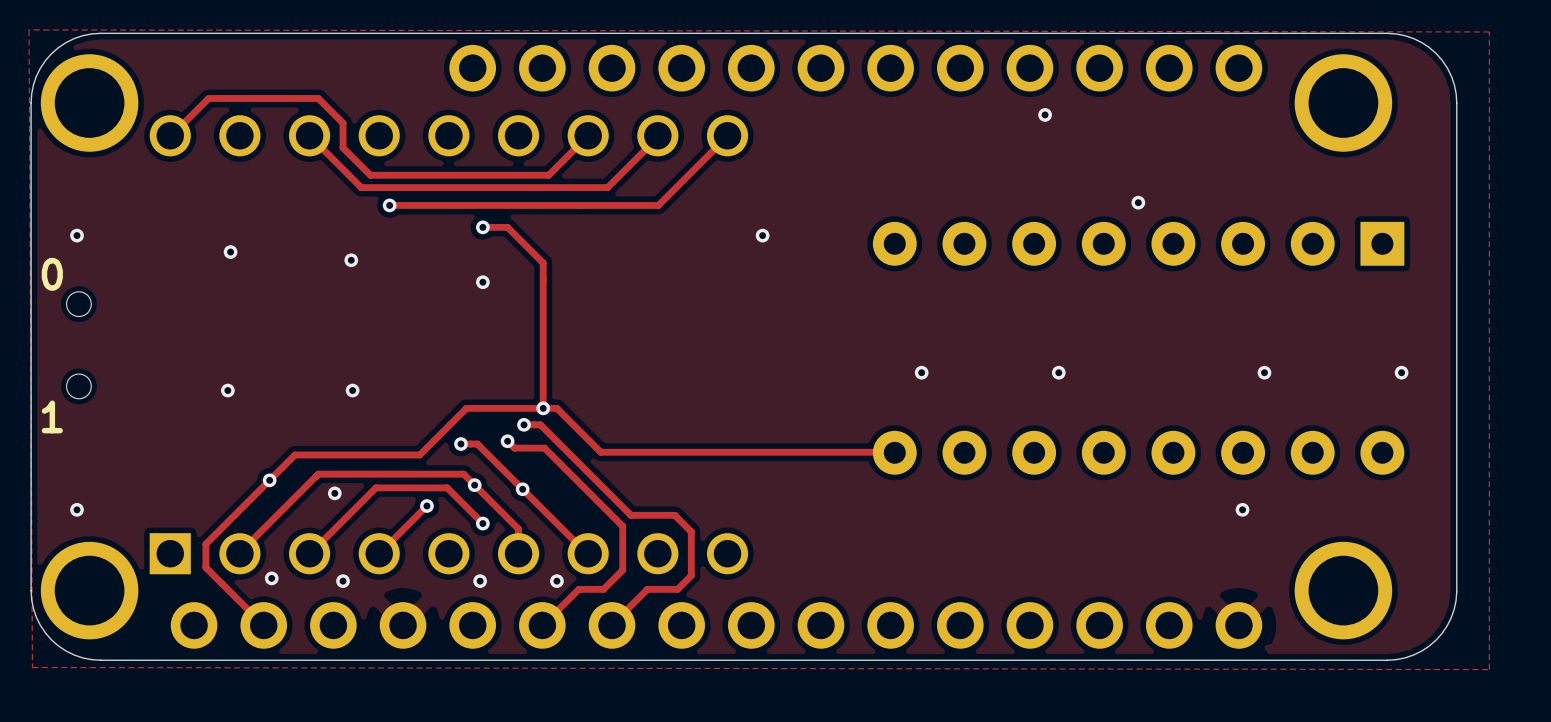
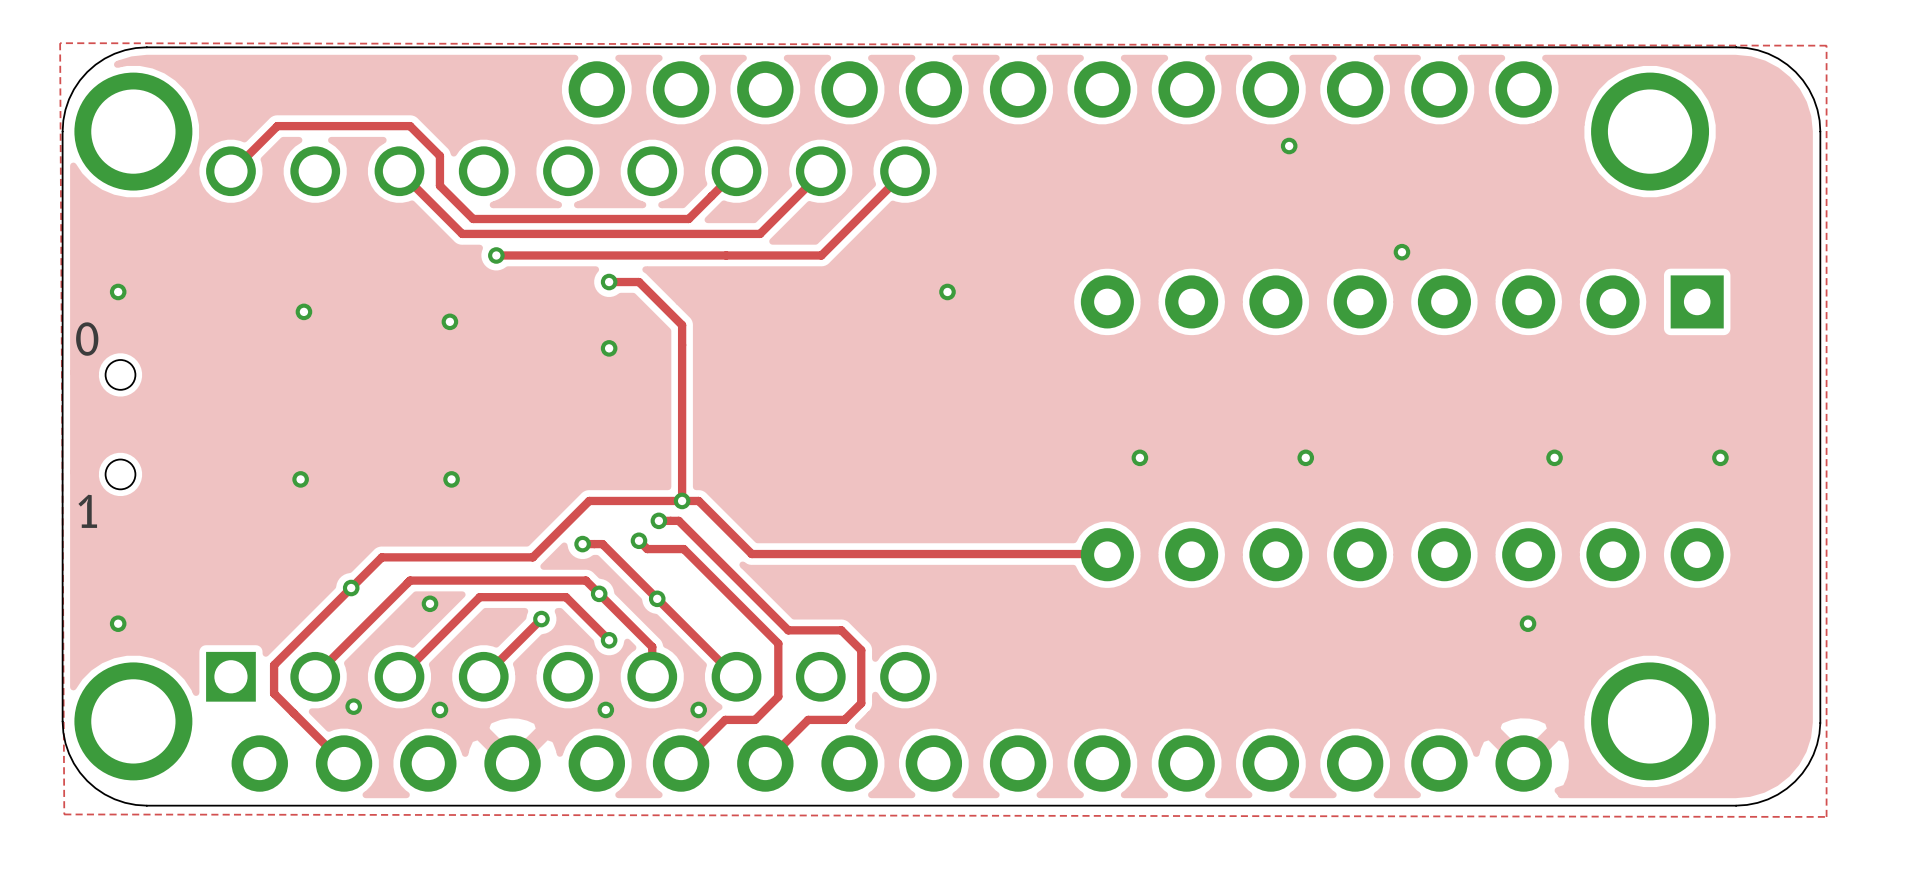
part footprint: [30, 32, 1458, 661] -> [61, 46, 1822, 807]

